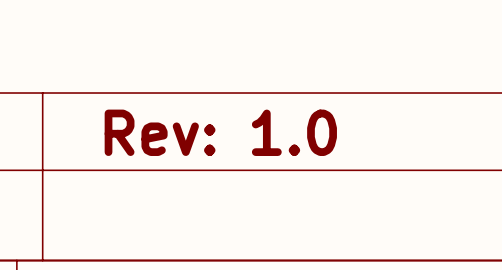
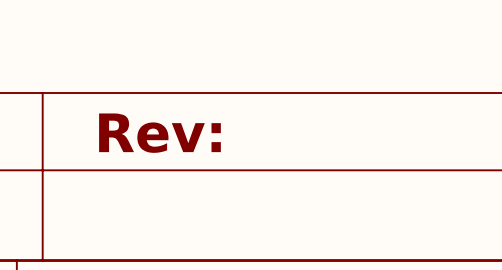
title block: Rev: 1.0 (220, 132) -> Rev: (159, 133)

